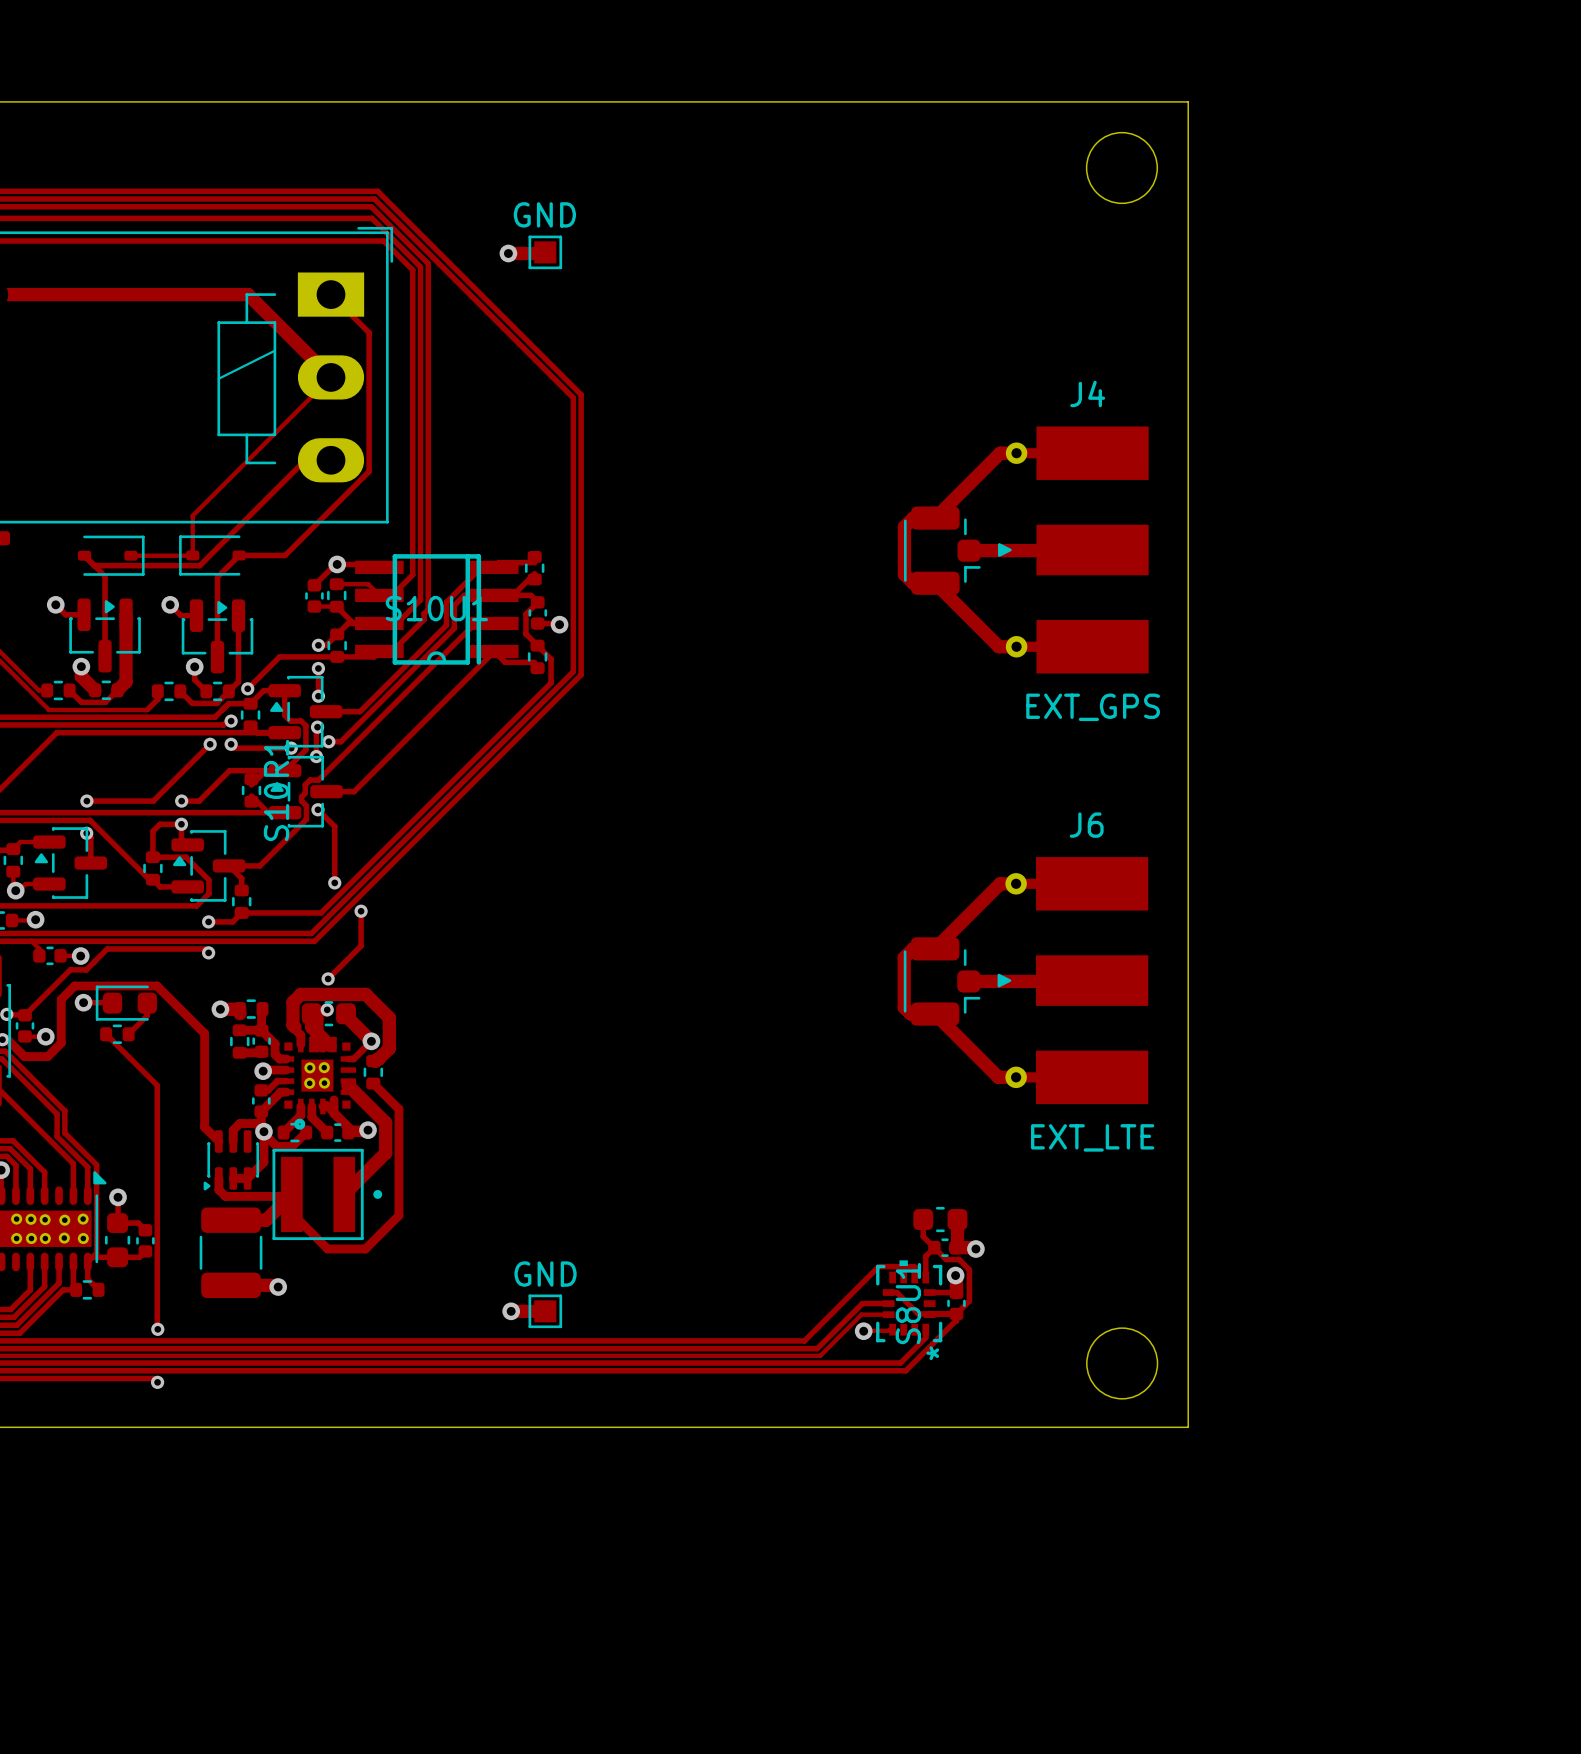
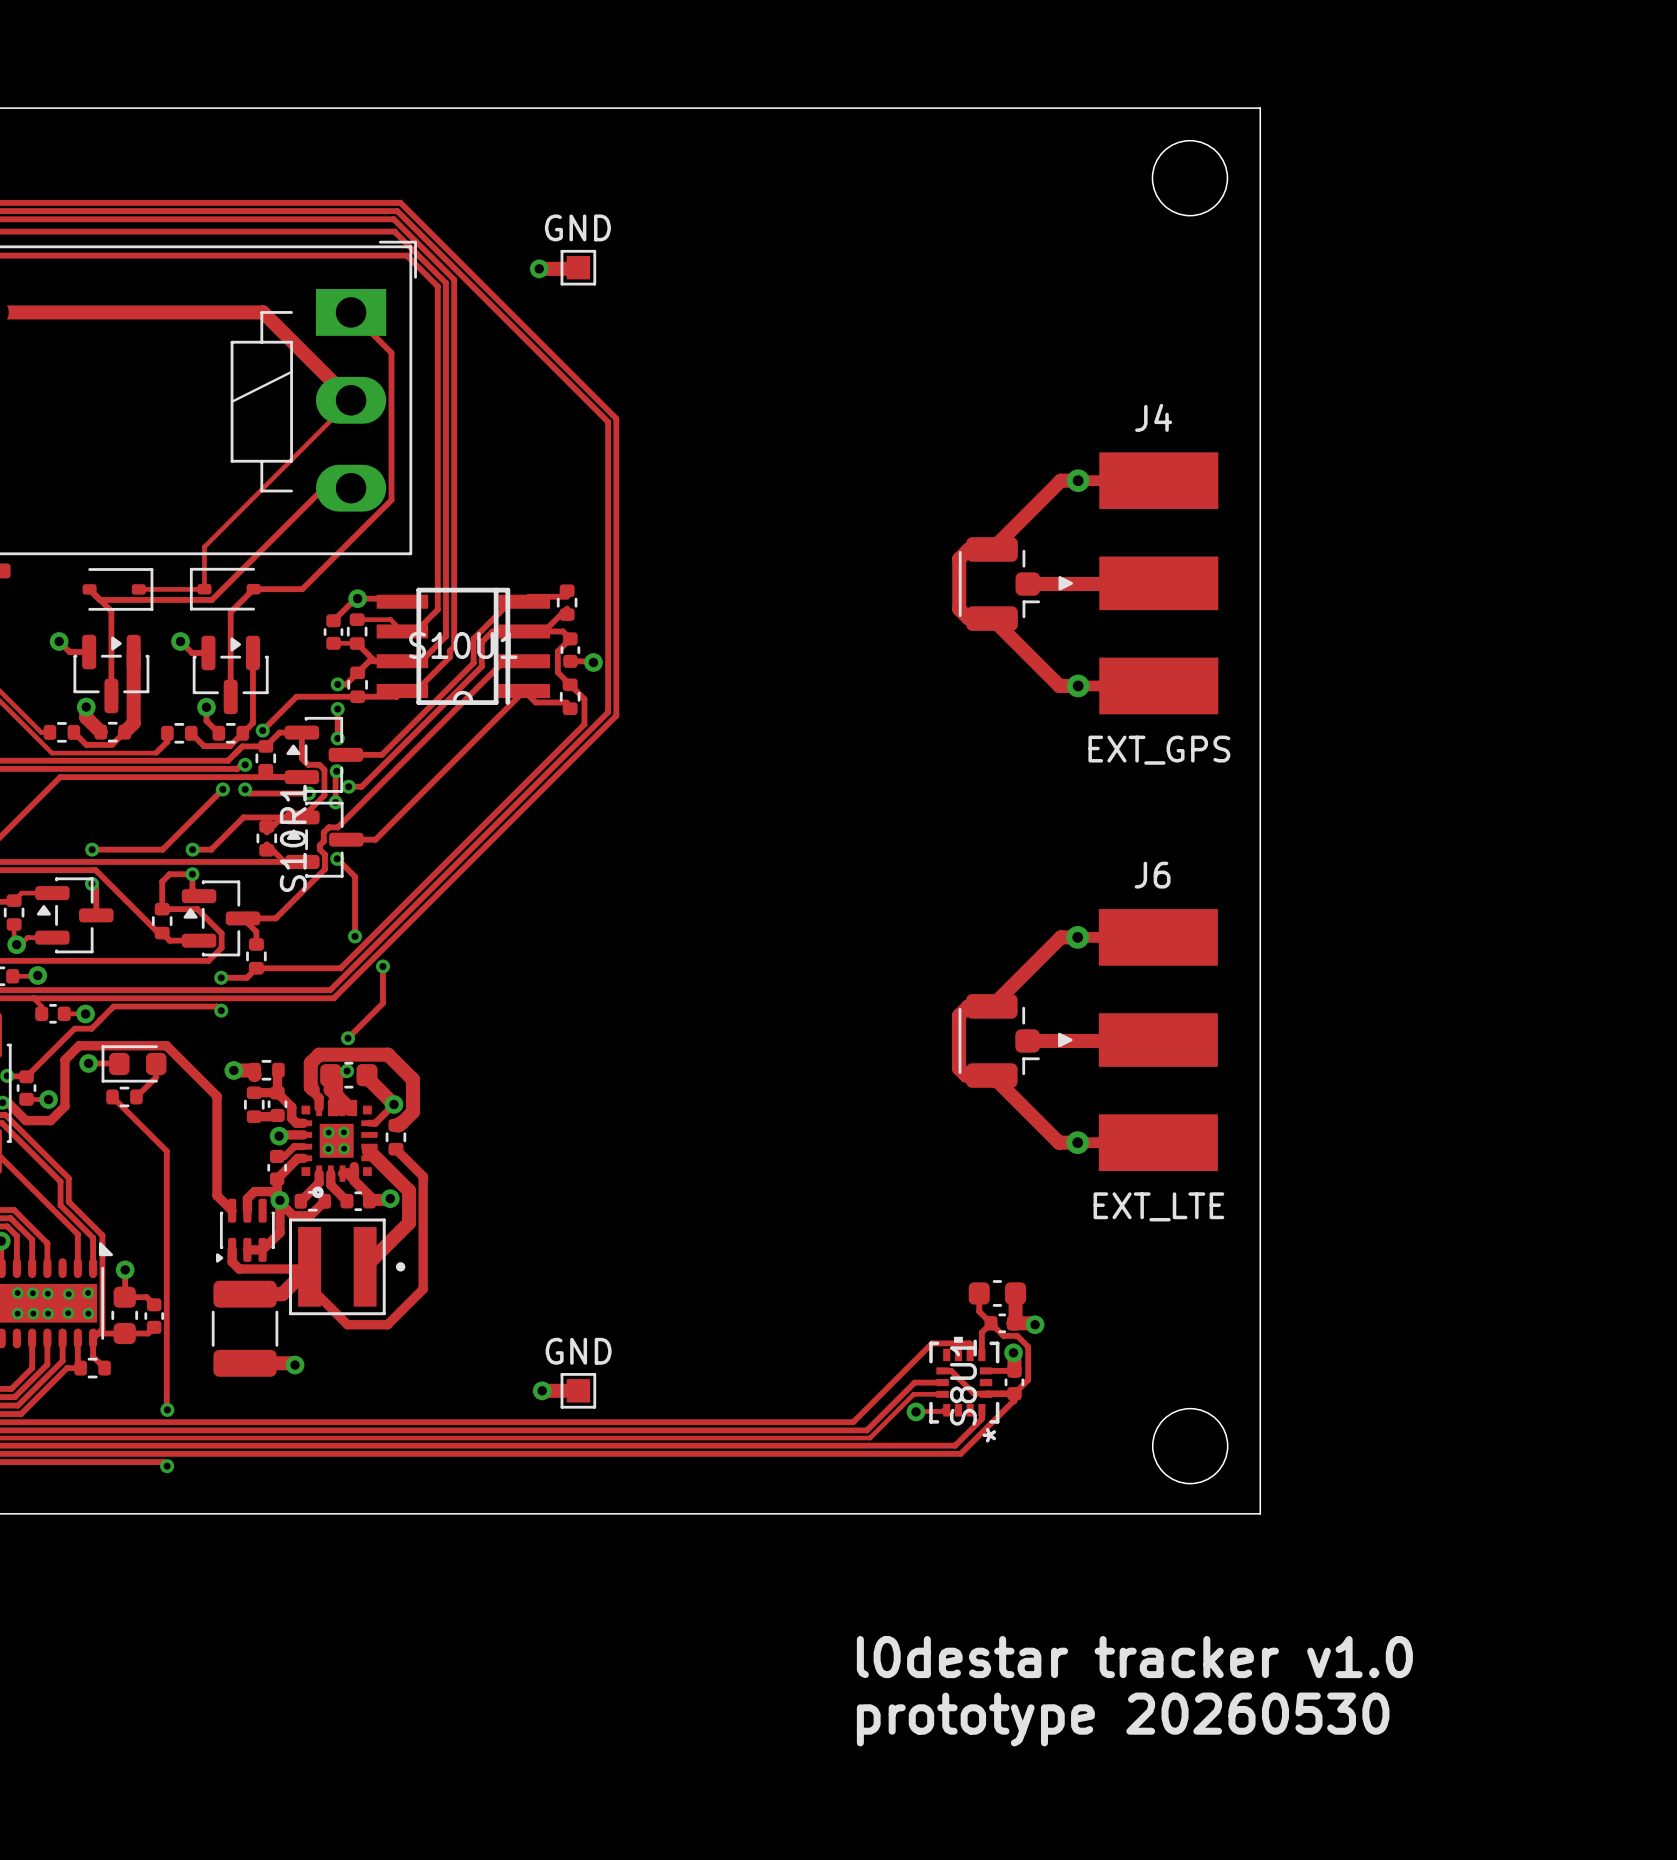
text: none -> l0destar tracker v1.0 (1134, 1657)
text: none -> prototype 20260530 (1123, 1719)

